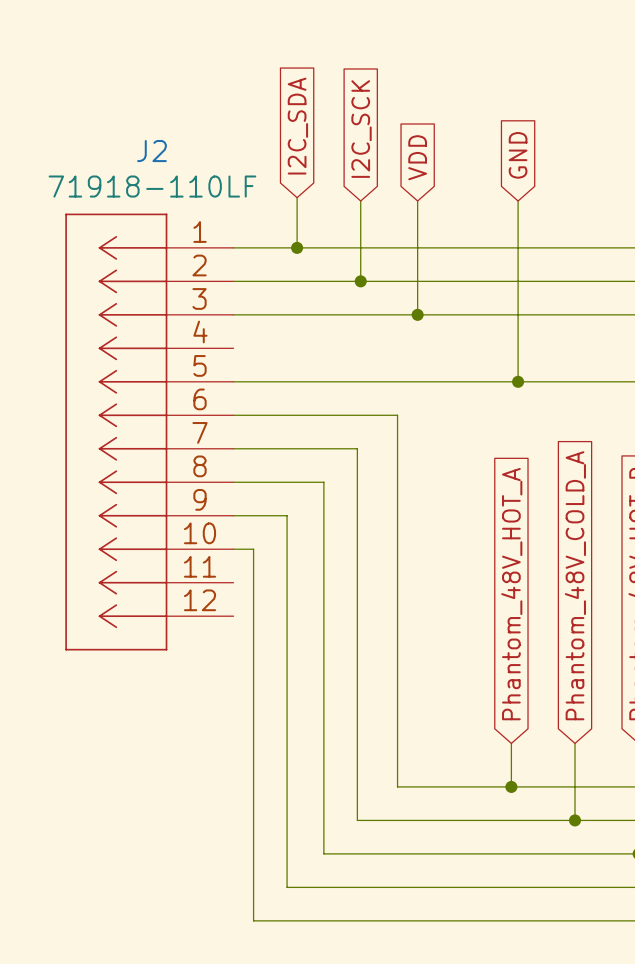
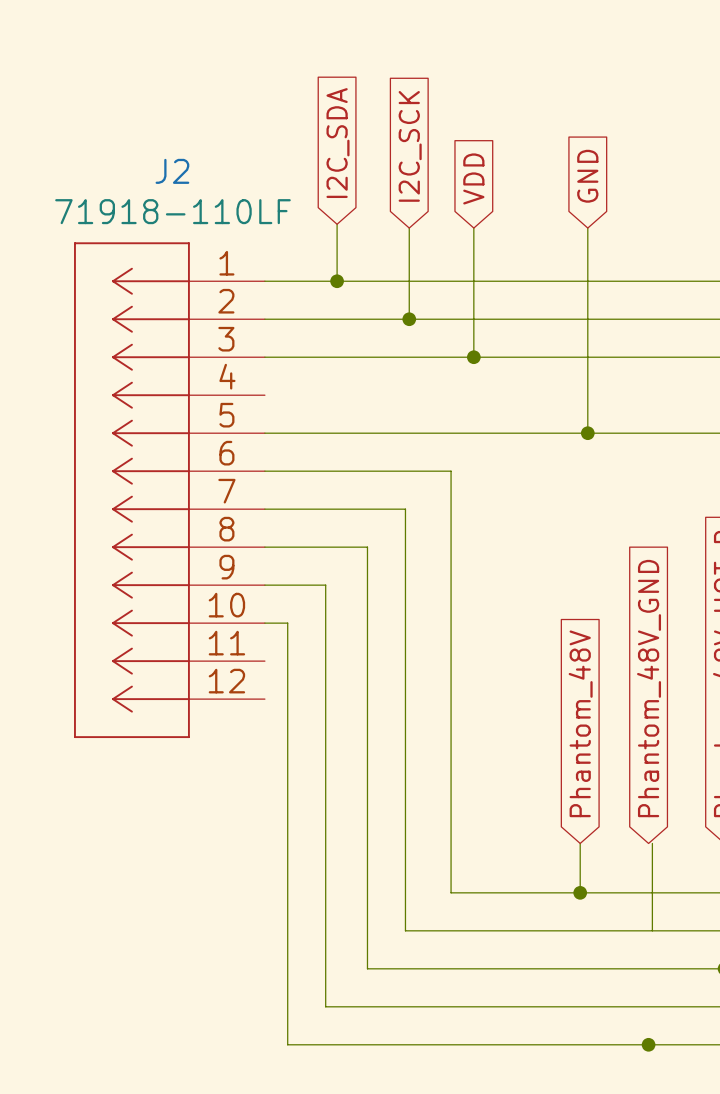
global label: Phantom_48V_COLD_A (575, 585) -> Phantom_48V_GND (649, 688)
global label: Phantom_48V_HOT_A (511, 594) -> Phantom_48V (580, 723)
junction: (575, 820) -> none
junction: none -> (648, 1044)

